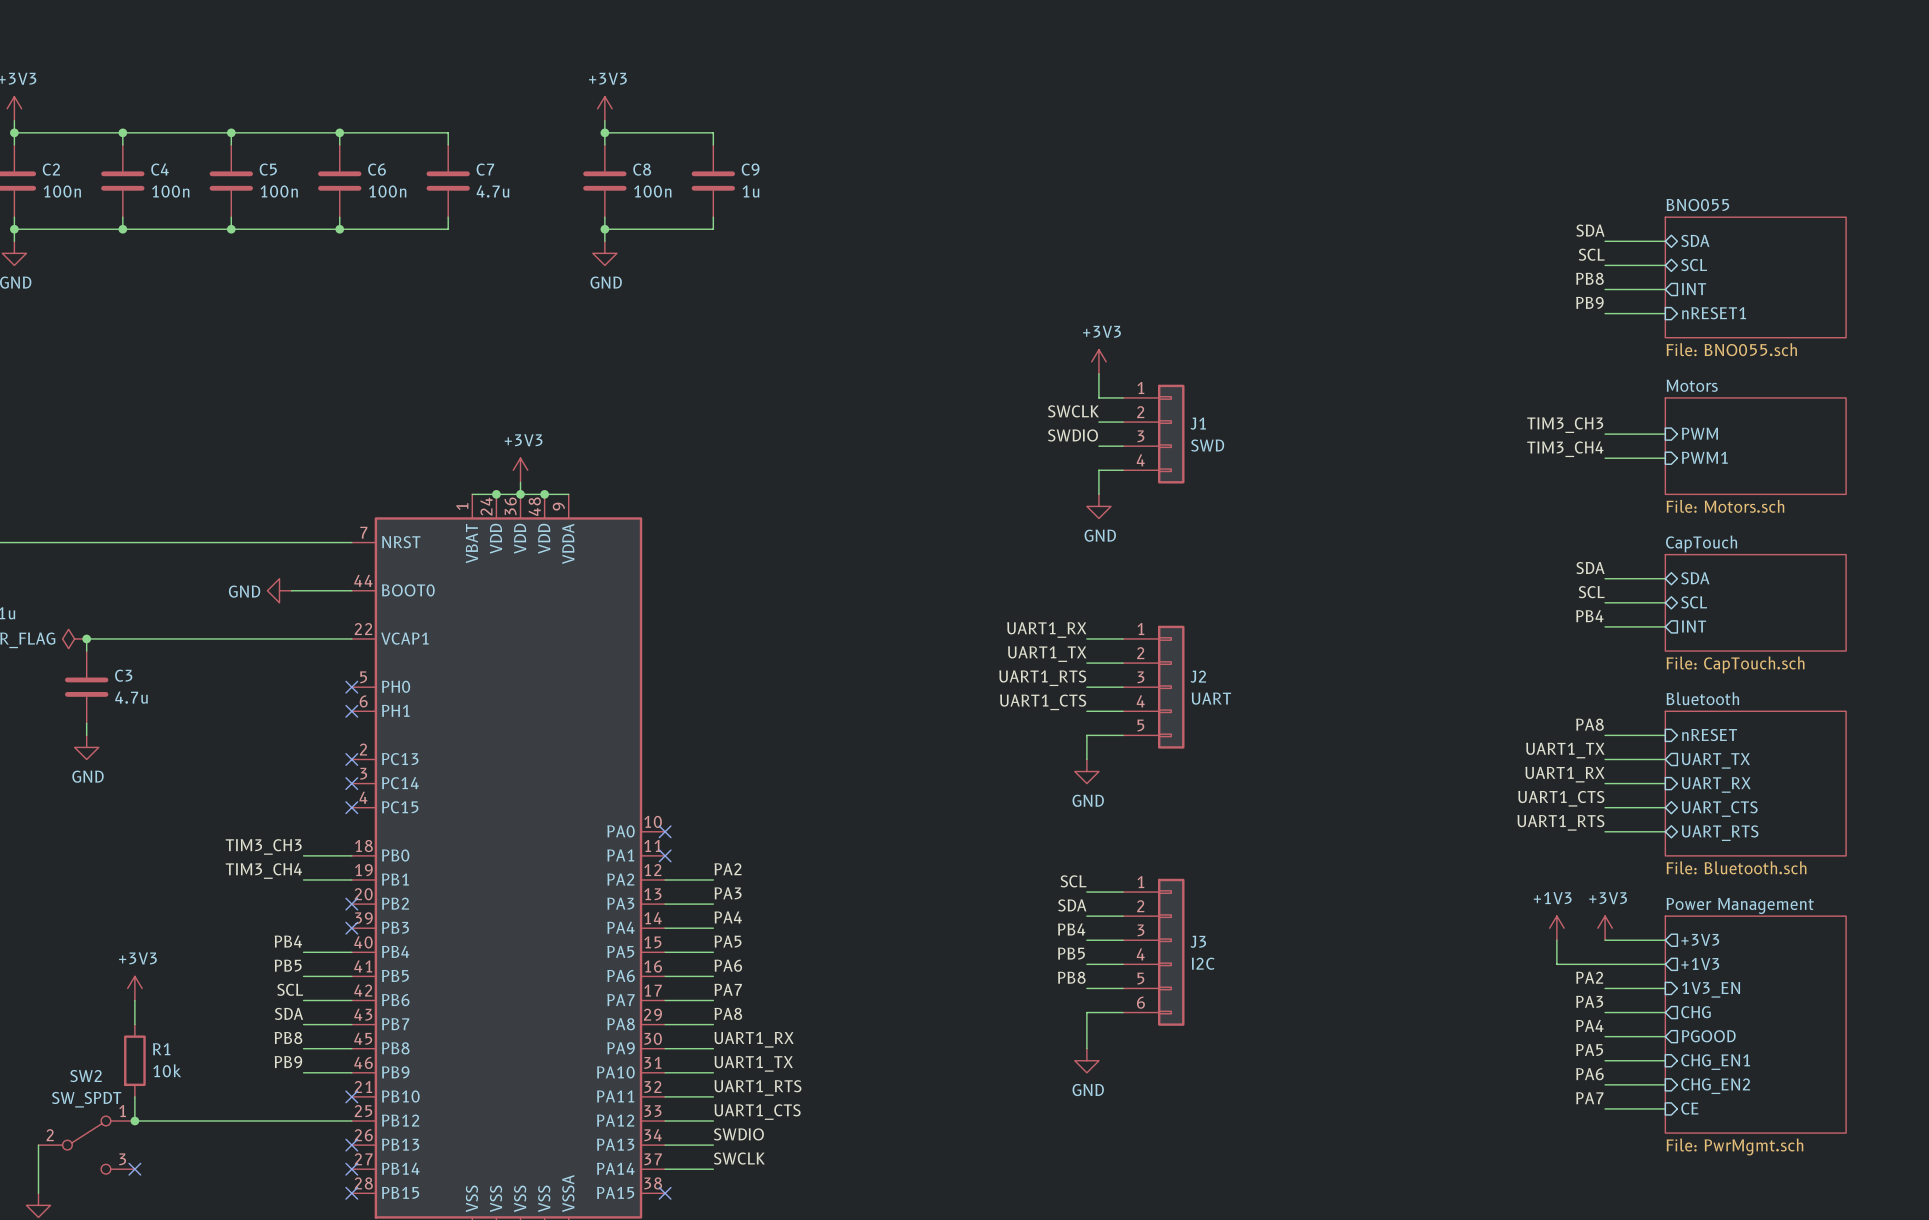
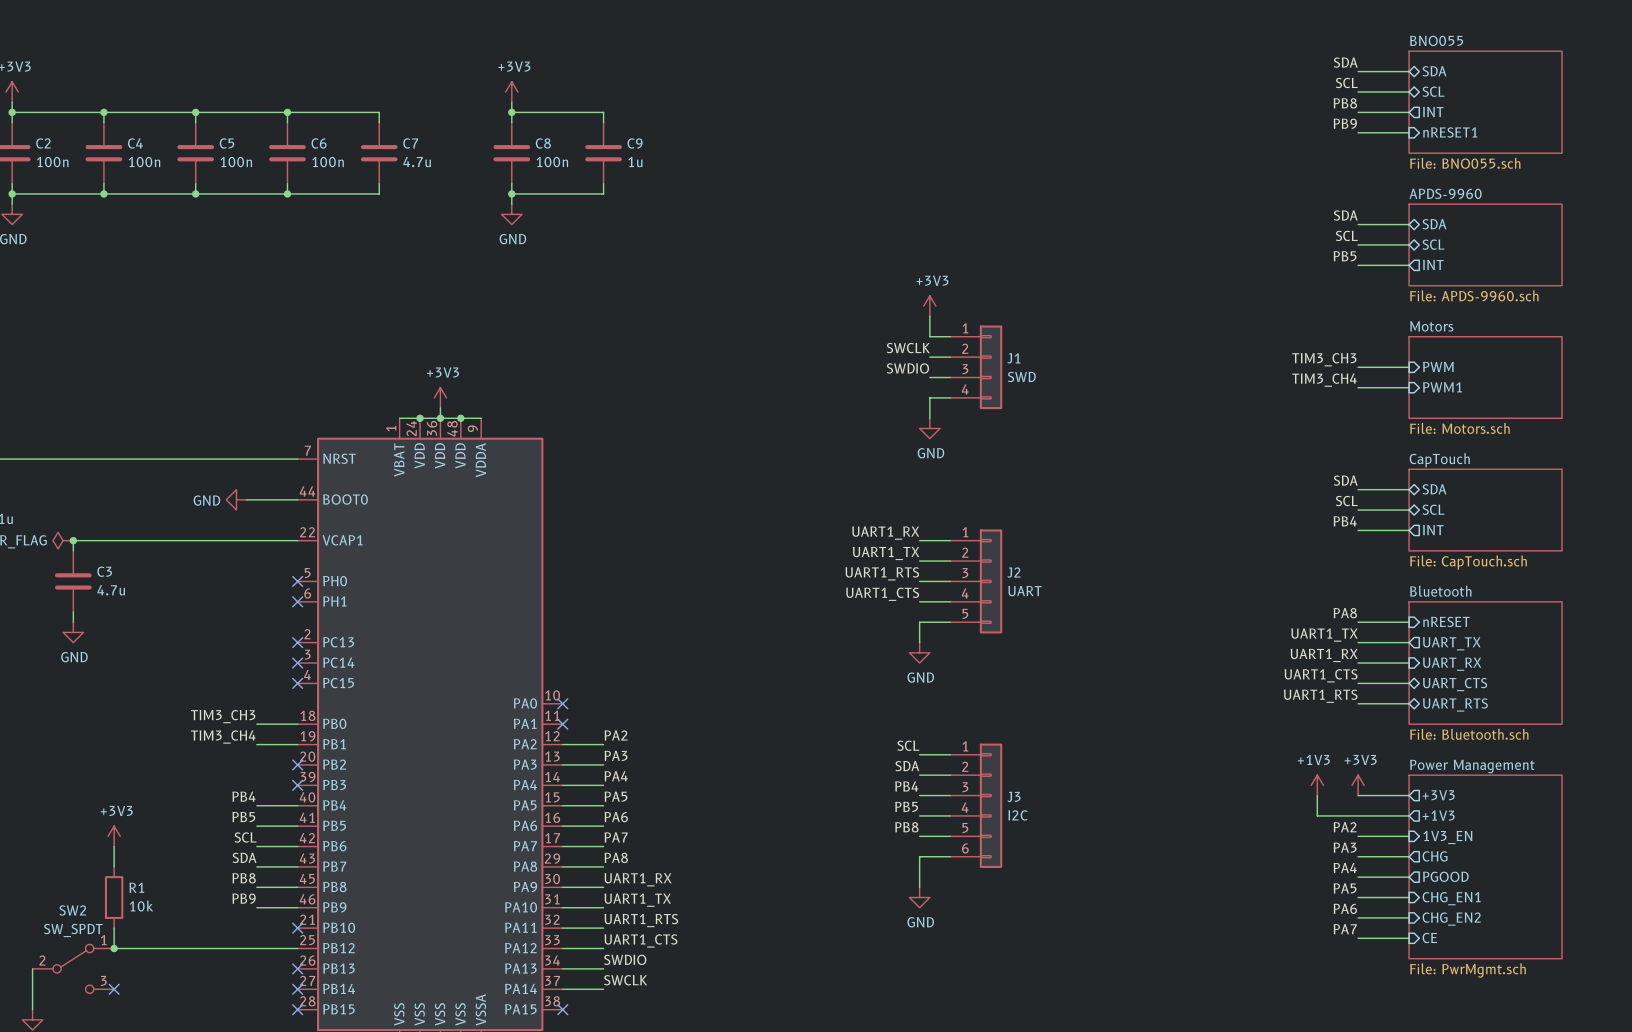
wire: none -> (1358, 71) (1409, 71)
label: none -> SCL (1346, 82)
wire: none -> (1358, 92) (1409, 92)
sheet pin: none -> SCL (1433, 91)
label: none -> PB8 (1345, 103)
wire: none -> (1358, 112) (1409, 112)
sheet pin: none -> INT (1433, 112)
label: none -> PB9 (1345, 123)
sheet pin: none -> nRESET1 (1450, 132)
label position: SDA (1590, 230) -> SDA (1345, 62)
sheet pin position: SDA (1695, 240) -> SDA (1434, 71)
wire: (1605, 241) (1665, 241) -> (1358, 132) (1409, 132)
label: SCL (1591, 254) -> SDA (1345, 215)
sheet pin: SCL (1694, 265) -> SDA (1434, 224)
sheet BNO055 position: (1755, 277) -> (1485, 102)
label: PB8 (1589, 278) -> SCL (1346, 235)
sheet pin shape: output (1694, 289) -> bidirectional (1433, 244)
sheet pin: INT (1694, 289) -> SCL (1433, 244)
sheet APDS-9960: none -> File: APDS-9960.sch (1485, 244)
label: PB9 (1589, 302) -> PB5 (1345, 256)
sheet pin shape: input (1714, 313) -> output (1433, 264)
sheet pin: nRESET1 (1714, 313) -> INT (1433, 264)

